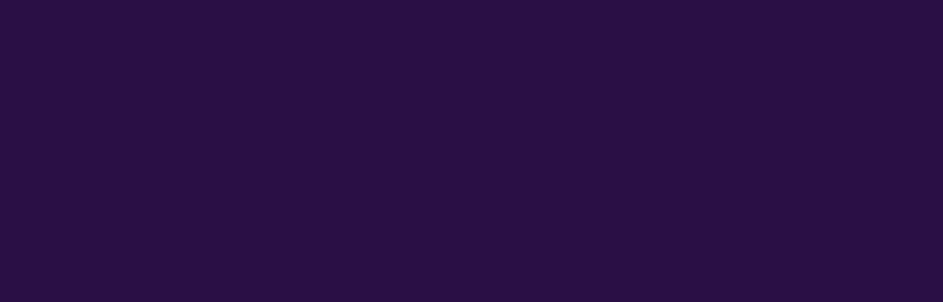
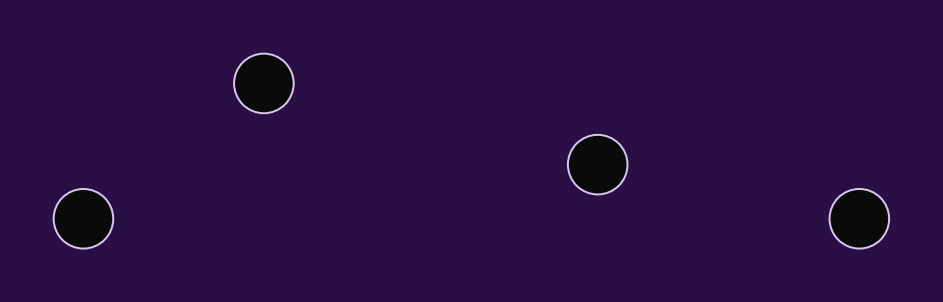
part: none -> (263, 83)
part: none -> (597, 164)
part: none -> (83, 218)
part: none -> (859, 218)

